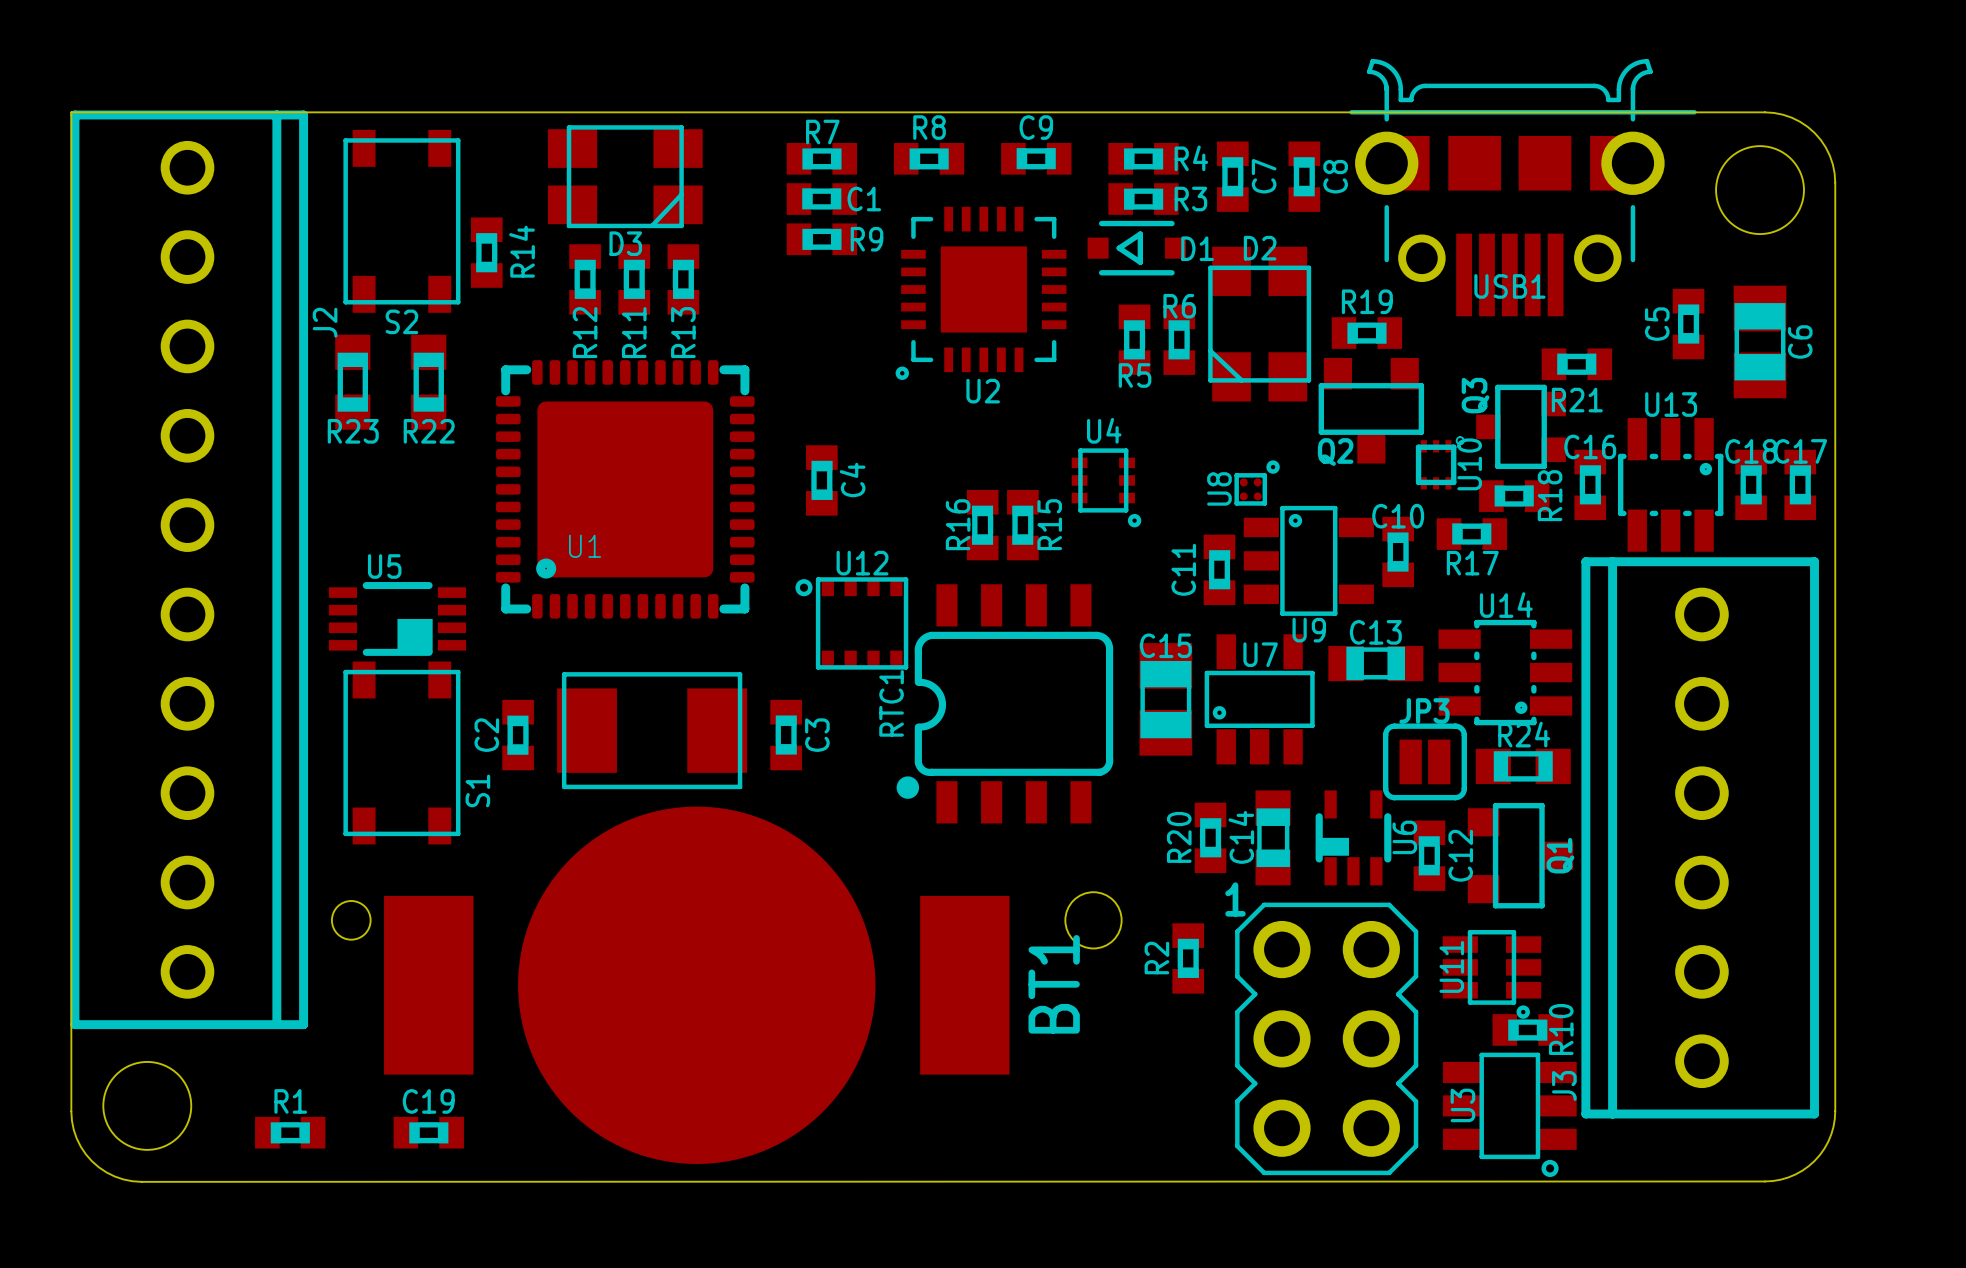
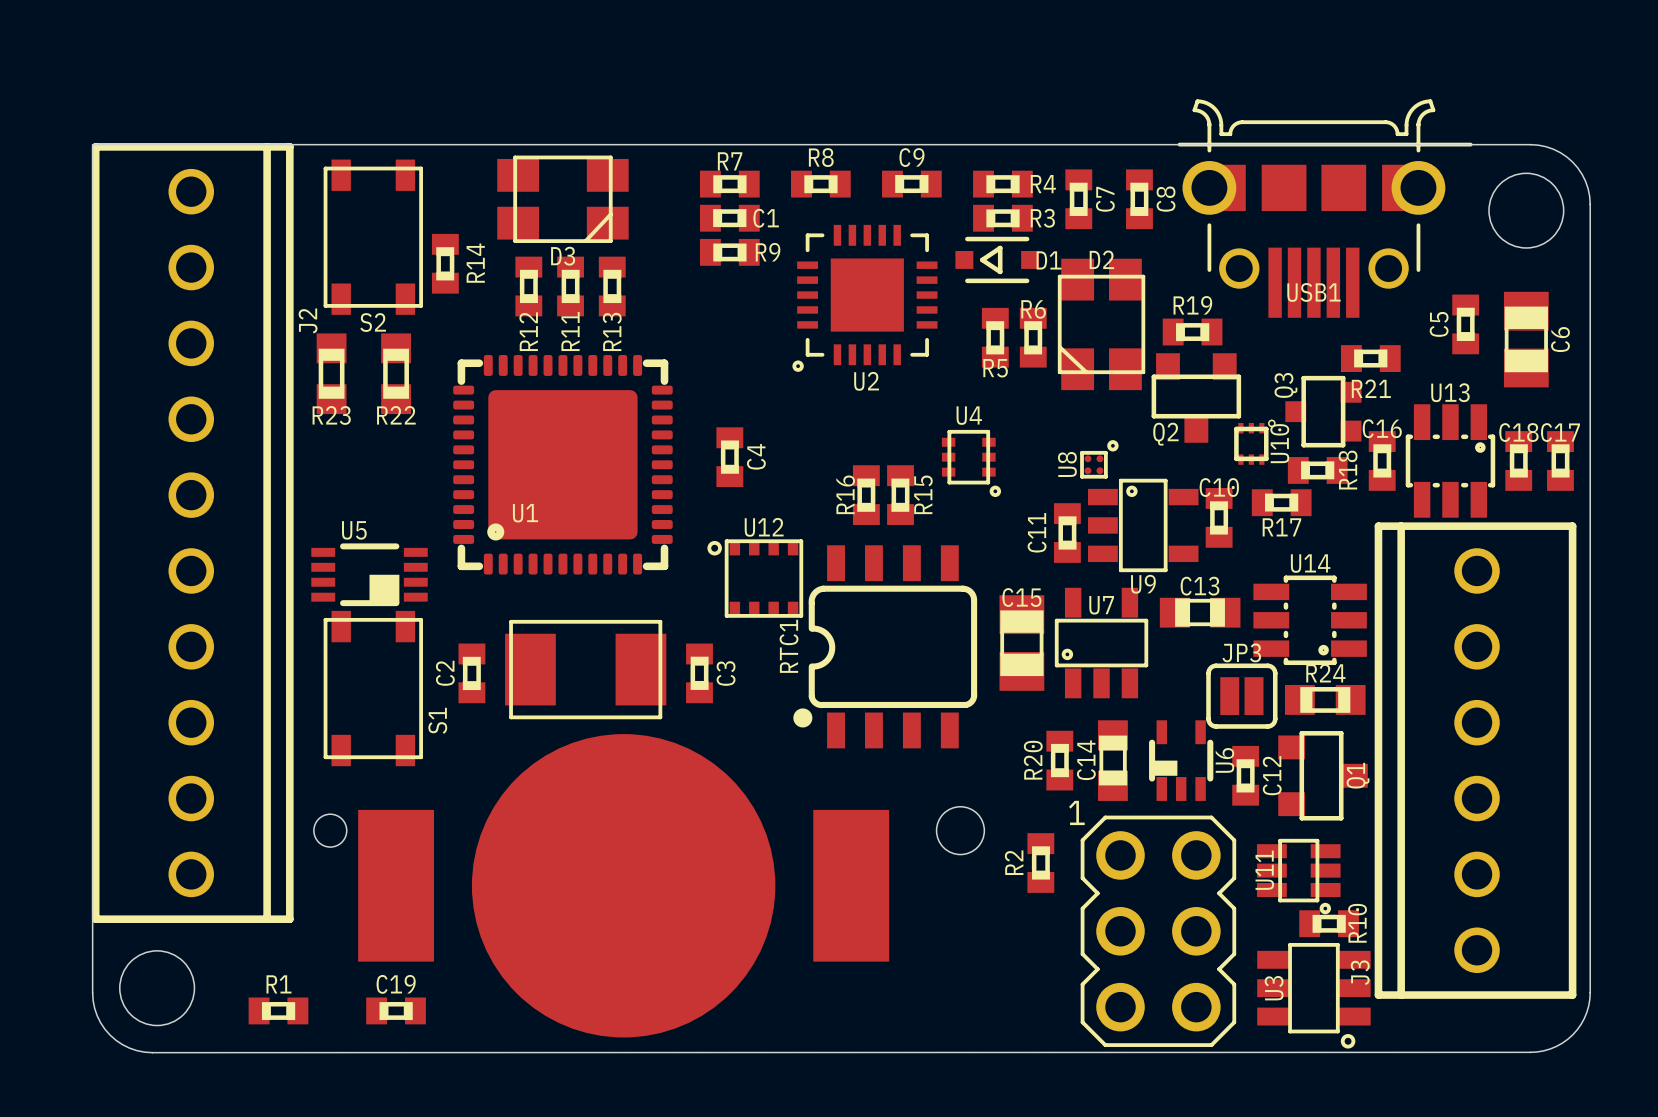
BT1 name: BT1 (1054, 984) -> none

